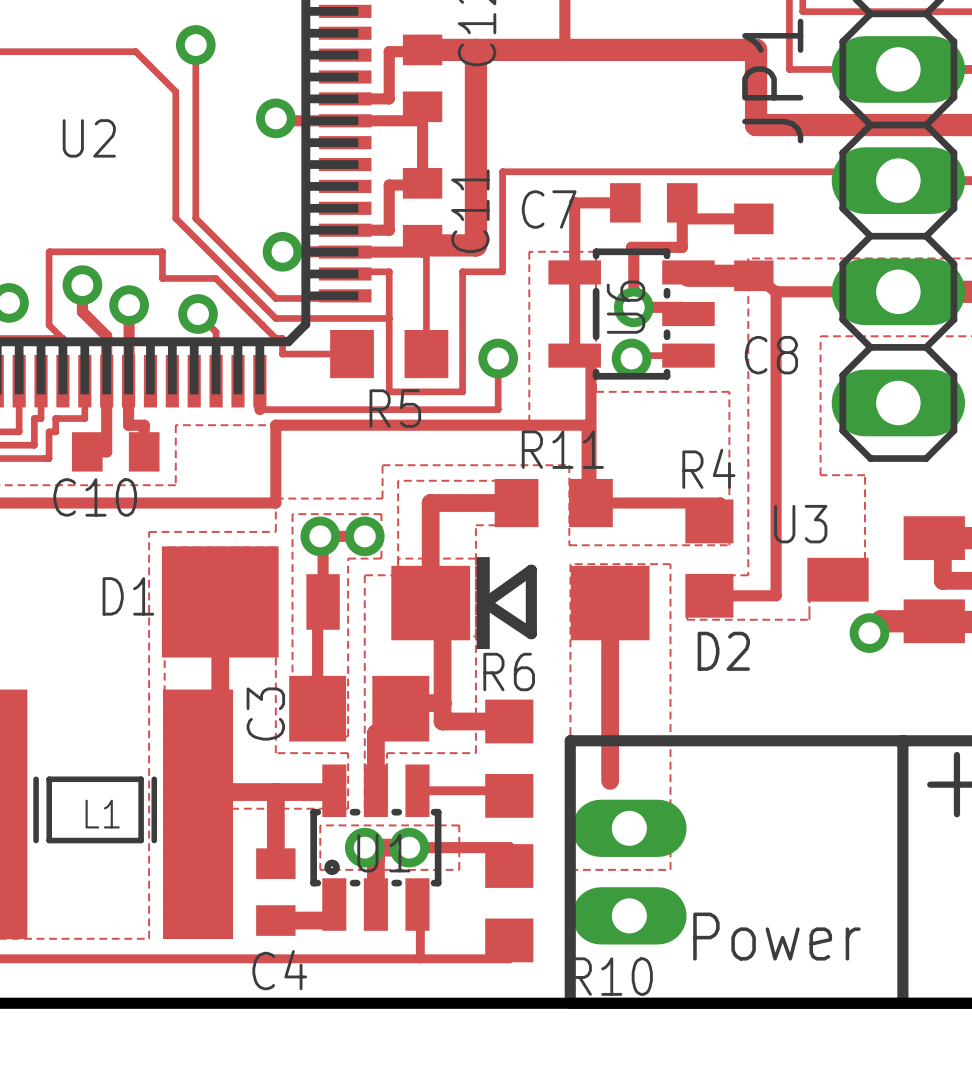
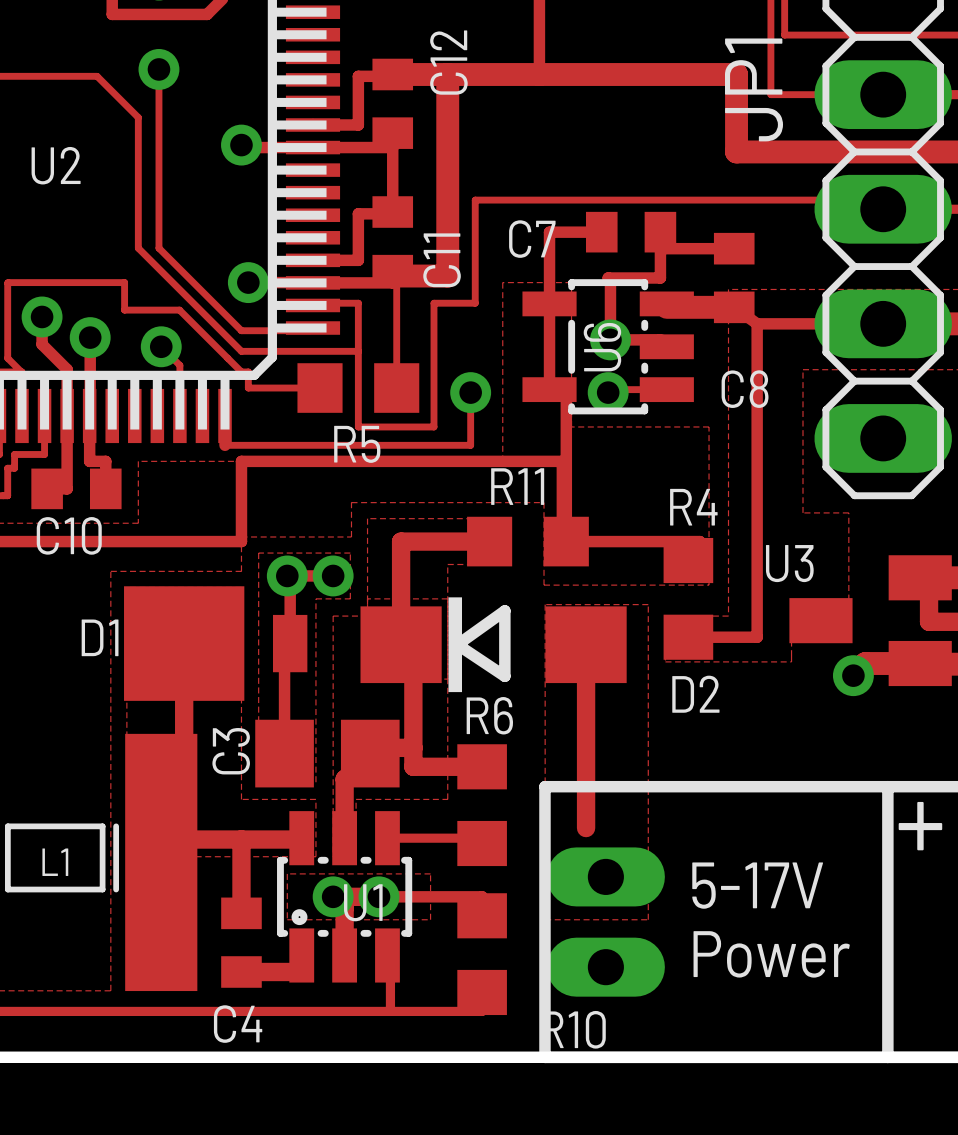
text: none -> 5-17V (757, 885)
text position: Power (776, 936) -> Power (771, 954)

